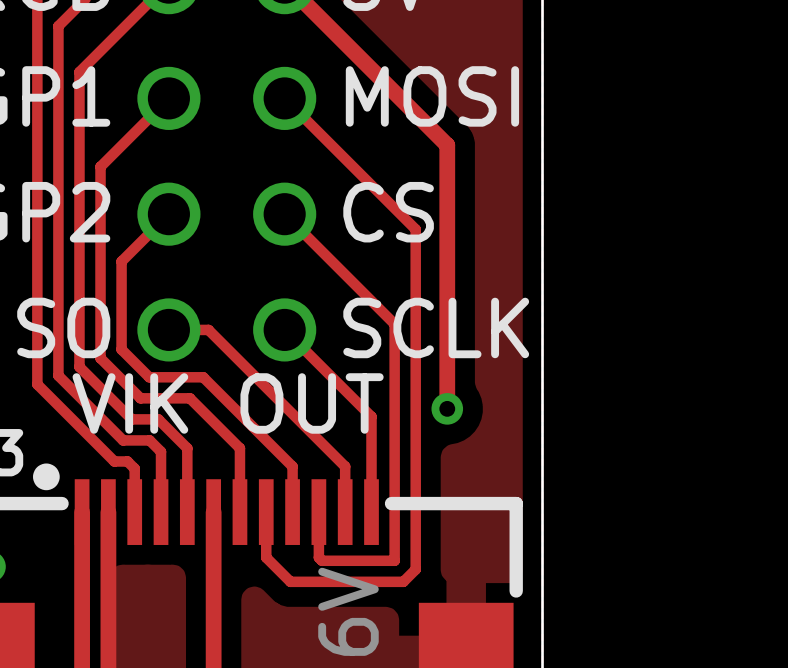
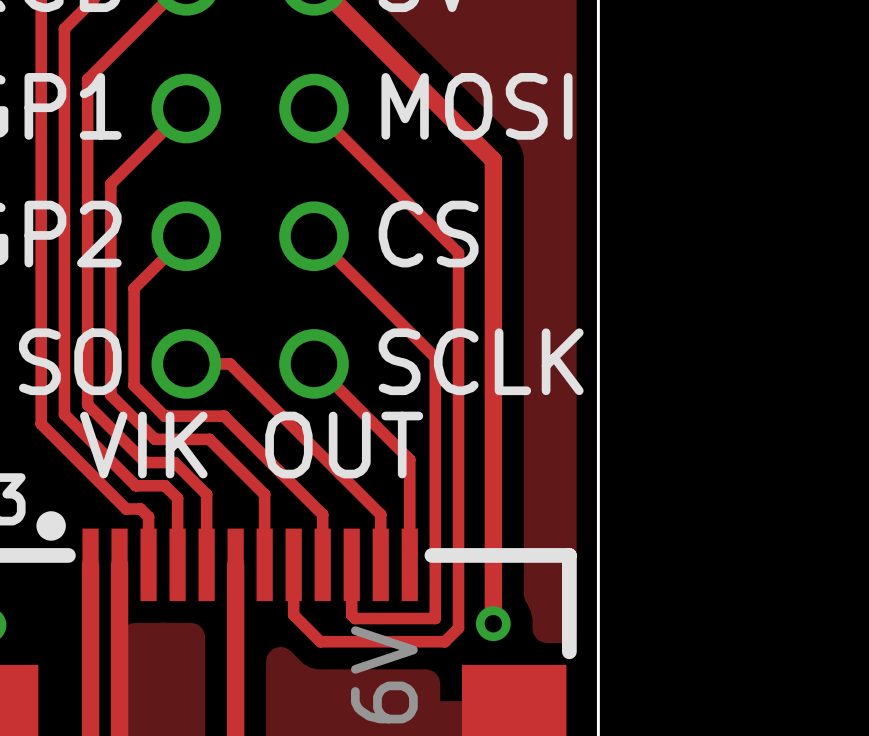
track: none -> (493, 450) (493, 623)
via position: (447, 408) -> (493, 623)

